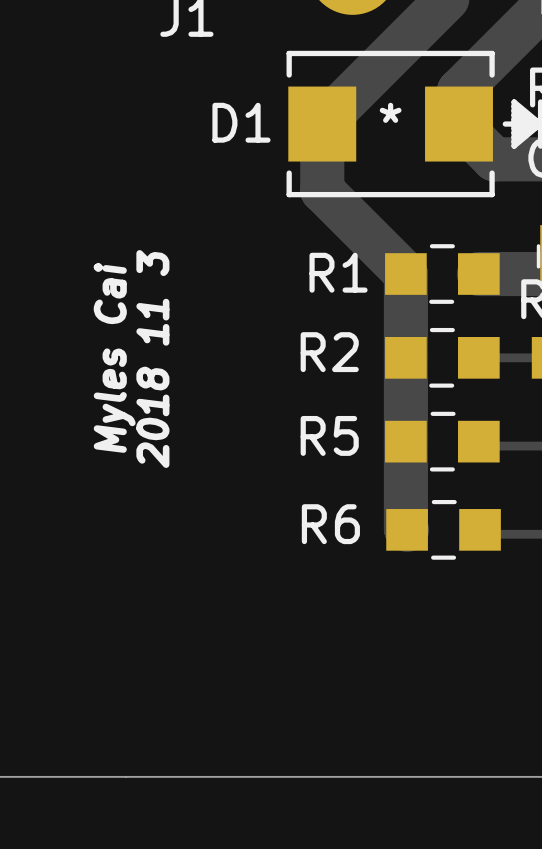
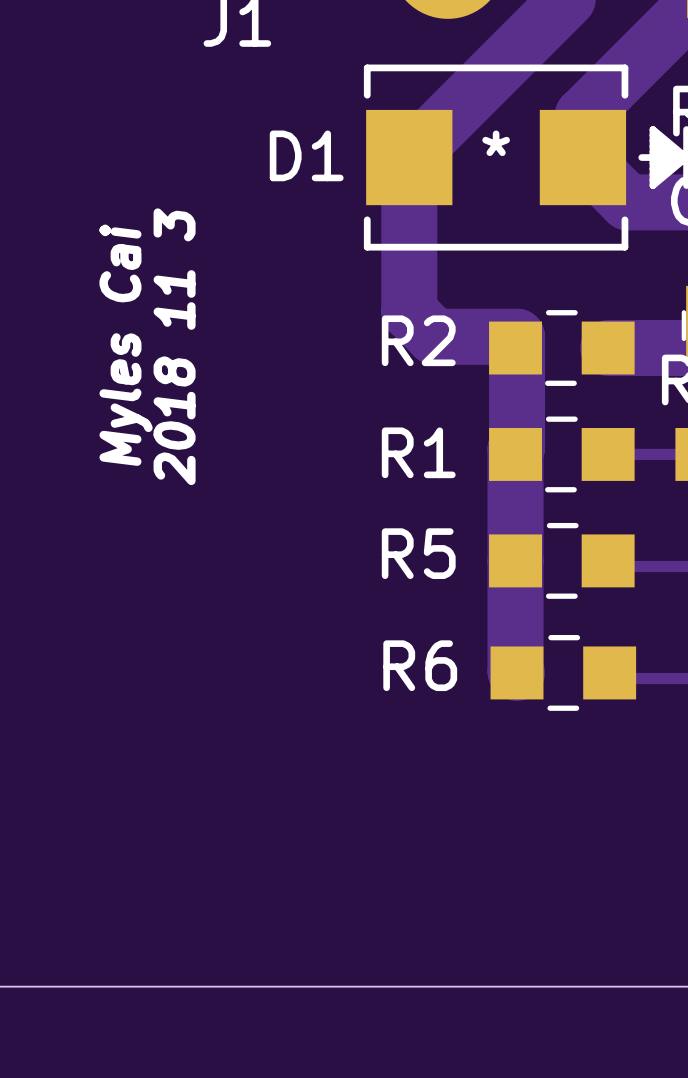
track: (322, 190) (405, 274) (405, 353) -> (409, 241) (409, 311) (434, 336) (517, 336) (515, 448)
R1 name: R1 (338, 272) -> R2 (418, 340)
R2 name: R2 (329, 352) -> R1 (418, 452)
text position: Myles Cai (114, 357) -> Myles Cai (126, 345)
text position: 2018 11 3 (152, 359) -> 2018 11 3 (174, 346)

